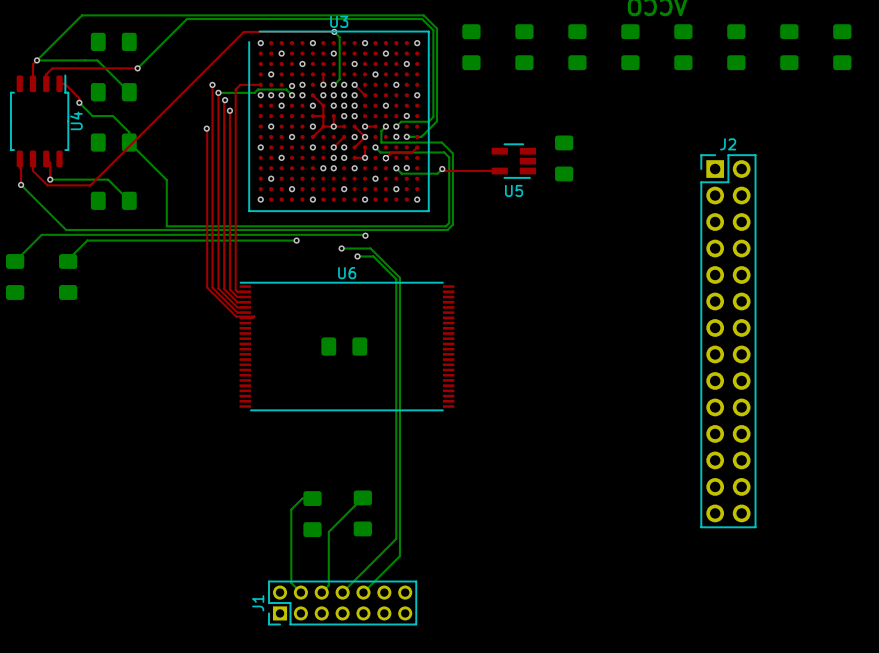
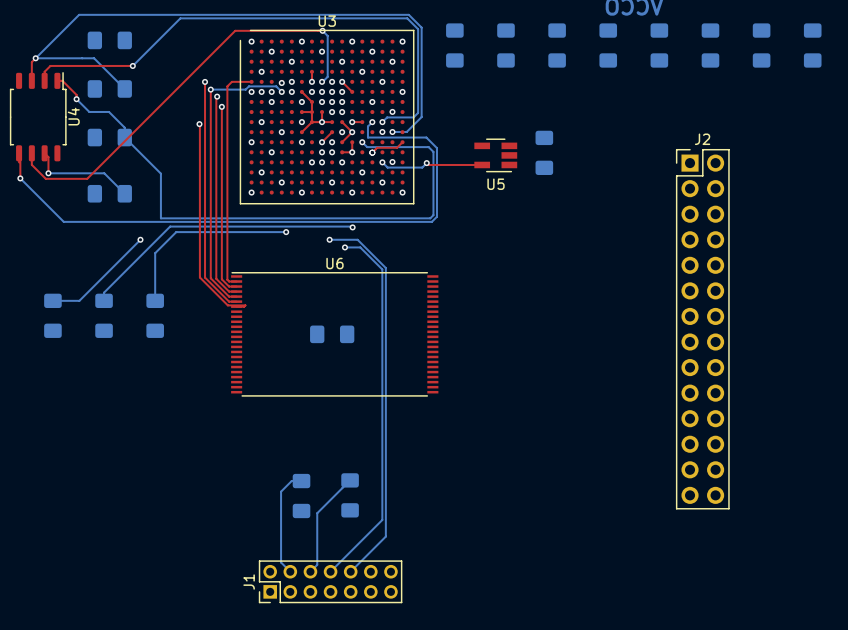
bottom track: (176, 234) (41, 234) (15, 261) -> (170, 226) (104, 292) (104, 300)
bottom track: (182, 240) (87, 240) (68, 261) -> (176, 232) (155, 253) (155, 300)
bottom track: none -> (140, 239) (79, 300) (52, 300)
via: none -> (140, 239)
part: (15, 276) -> none
part: (68, 276) -> none
part: none -> (52, 315)
part: none -> (104, 315)
part: none -> (155, 315)

